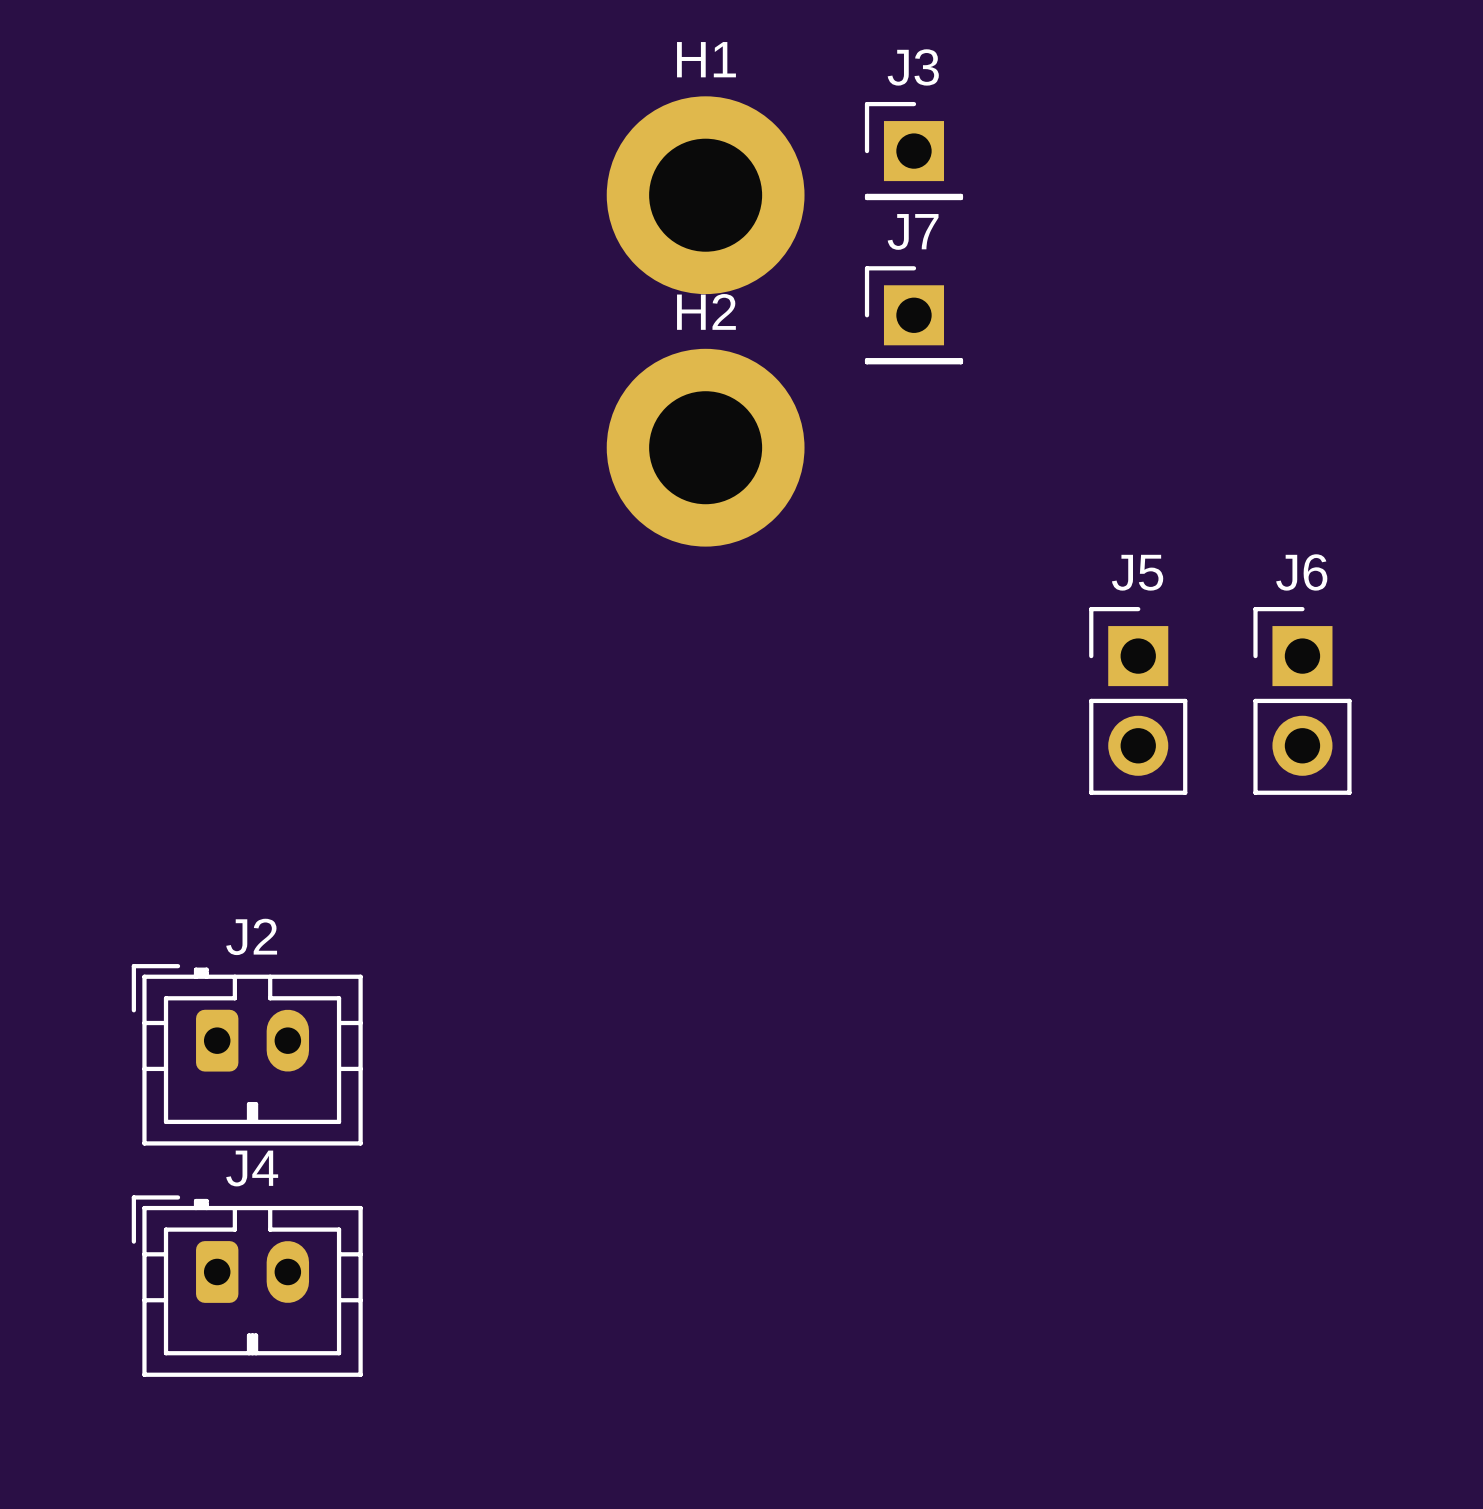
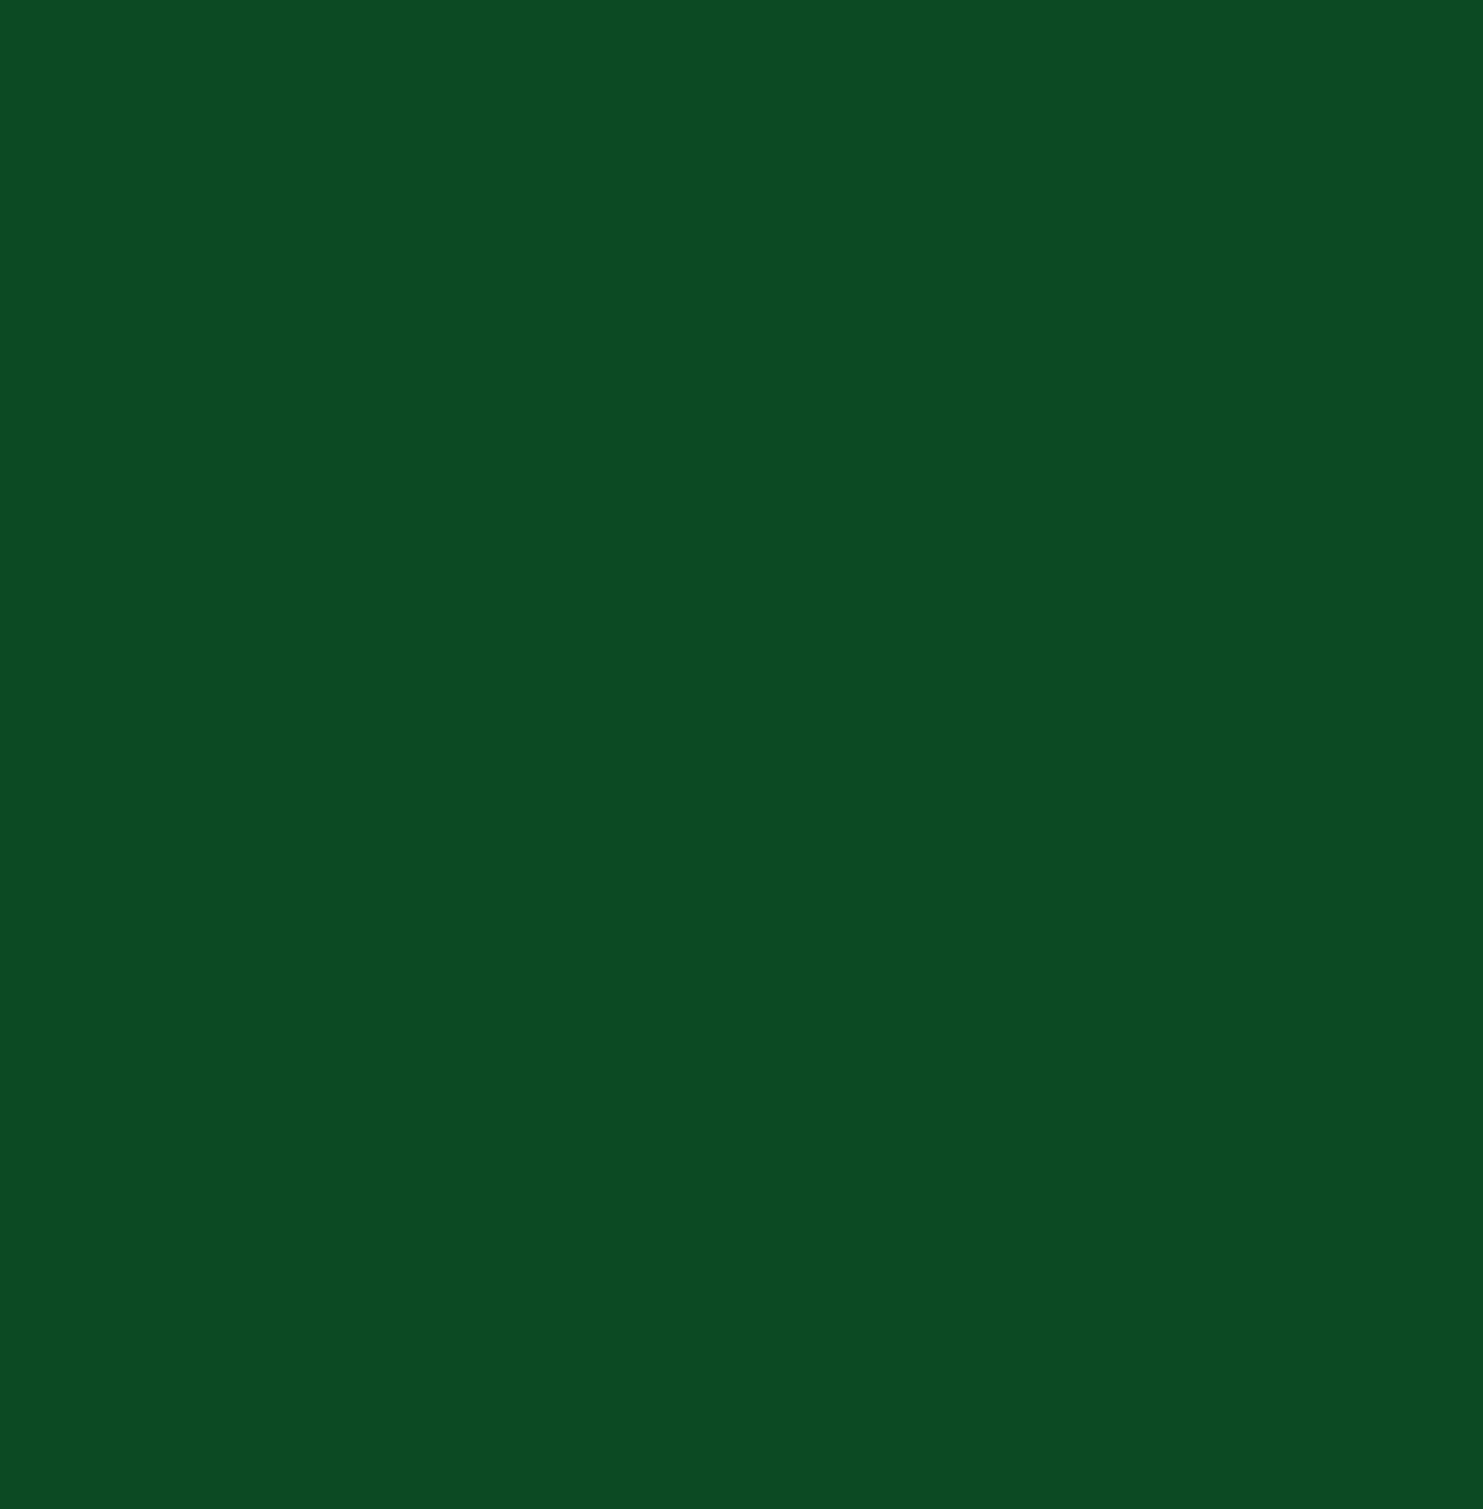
J3: (913, 151) -> none
H1: (705, 195) -> none
J7: (913, 315) -> none
H2: (705, 447) -> none
J5: (1138, 700) -> none
J6: (1302, 700) -> none
J2: (247, 1054) -> none
J4: (247, 1286) -> none

